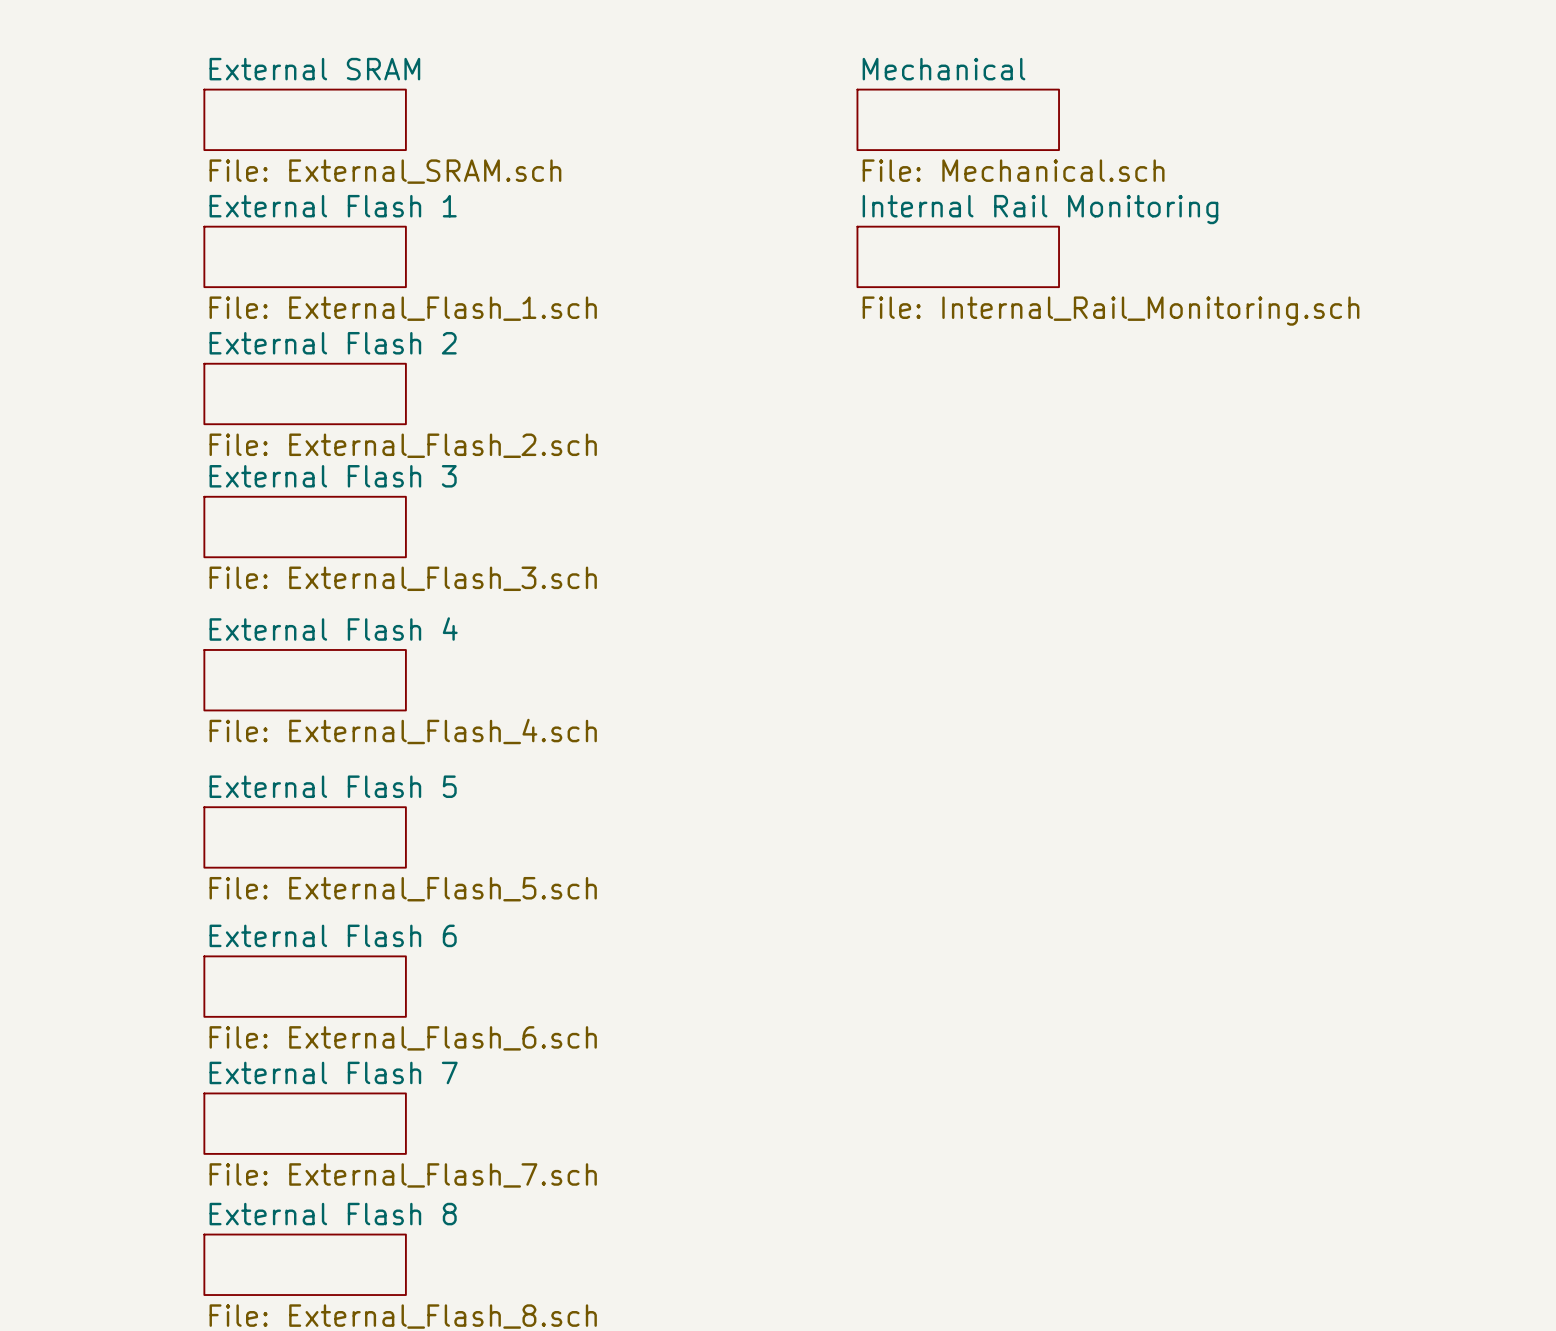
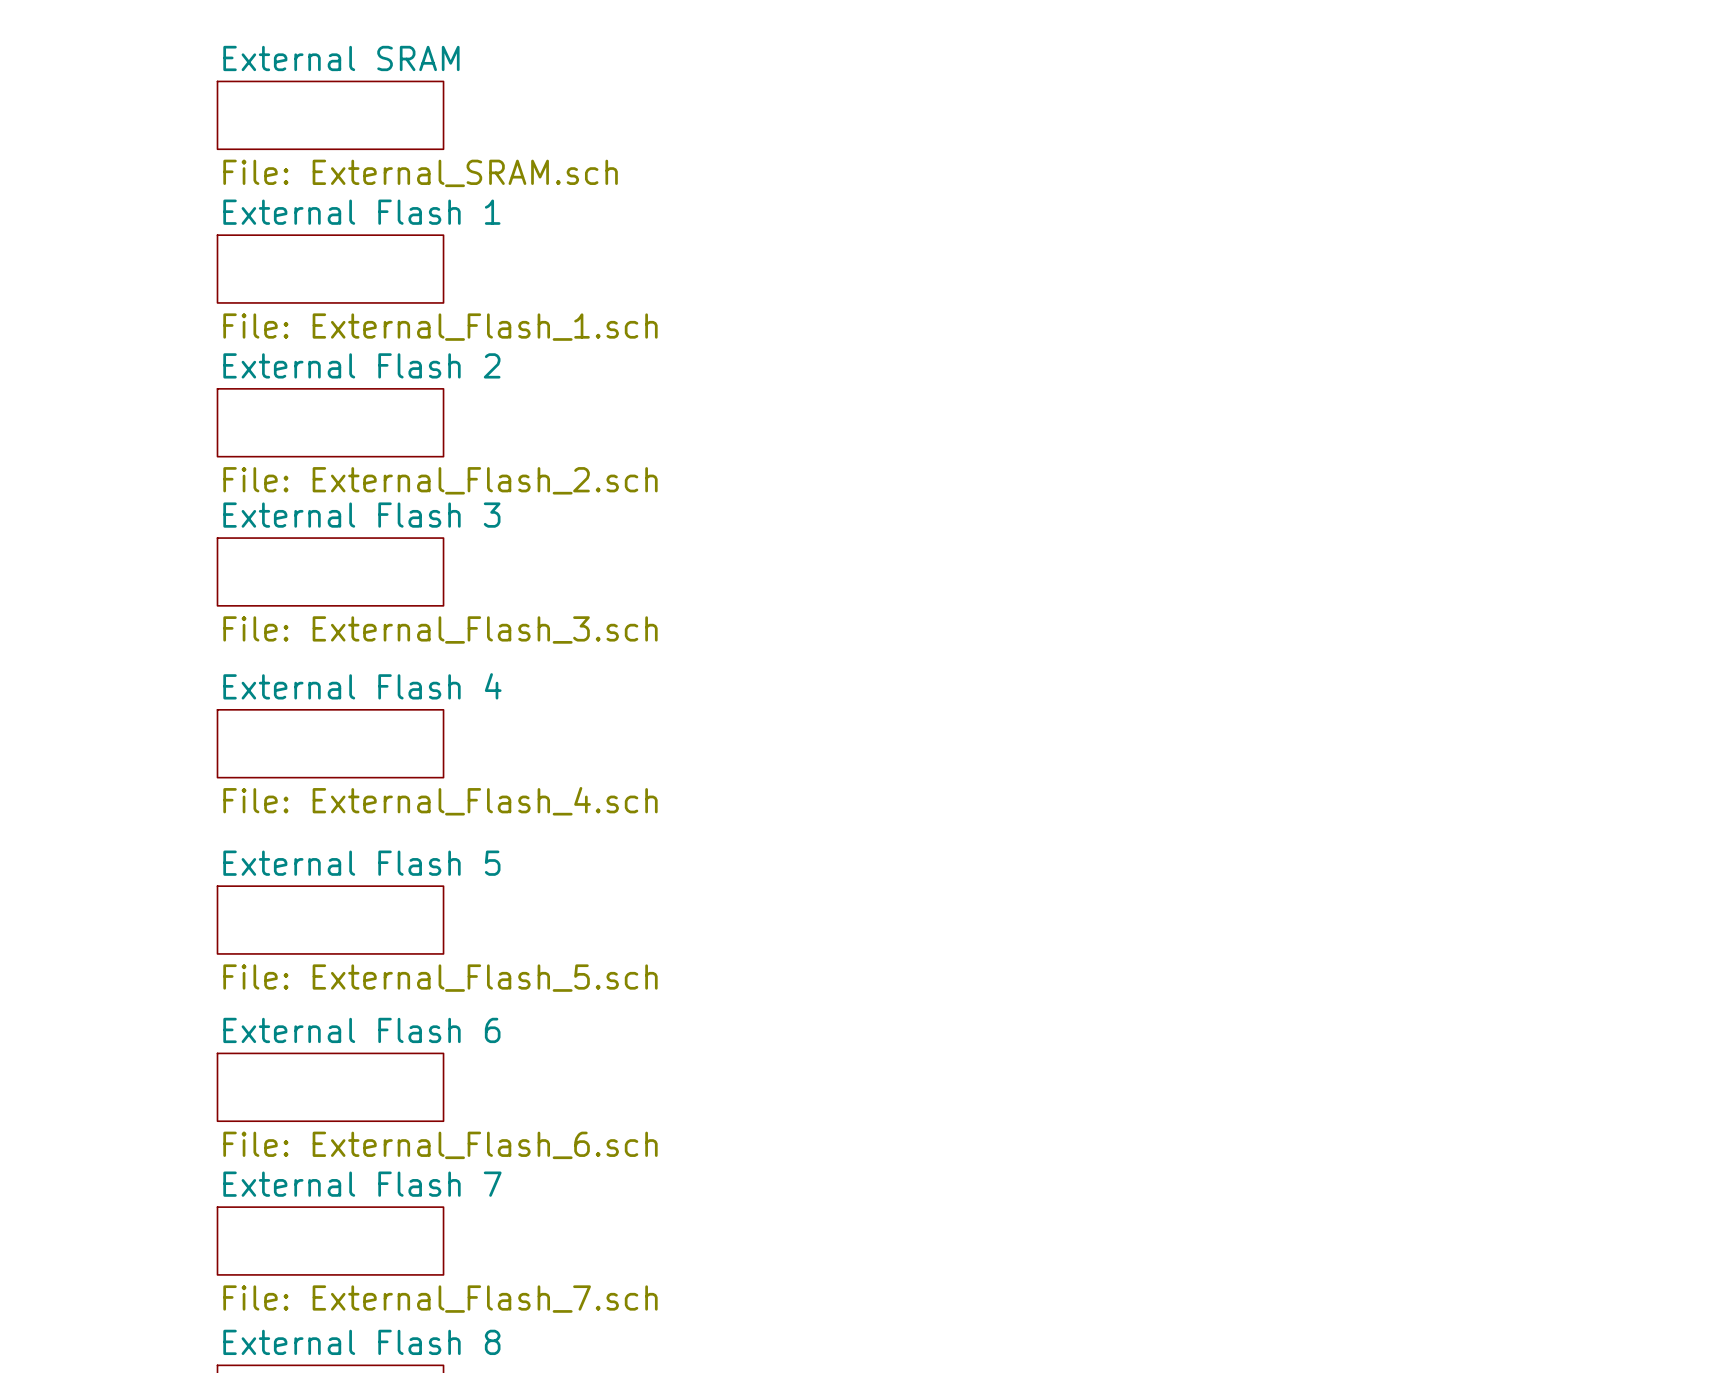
sheet Mechanical: File: Mechanical.sch (958, 119) -> none
sheet Internal Rail Monitoring: File: Internal_Rail_Monitoring.sch (958, 256) -> none

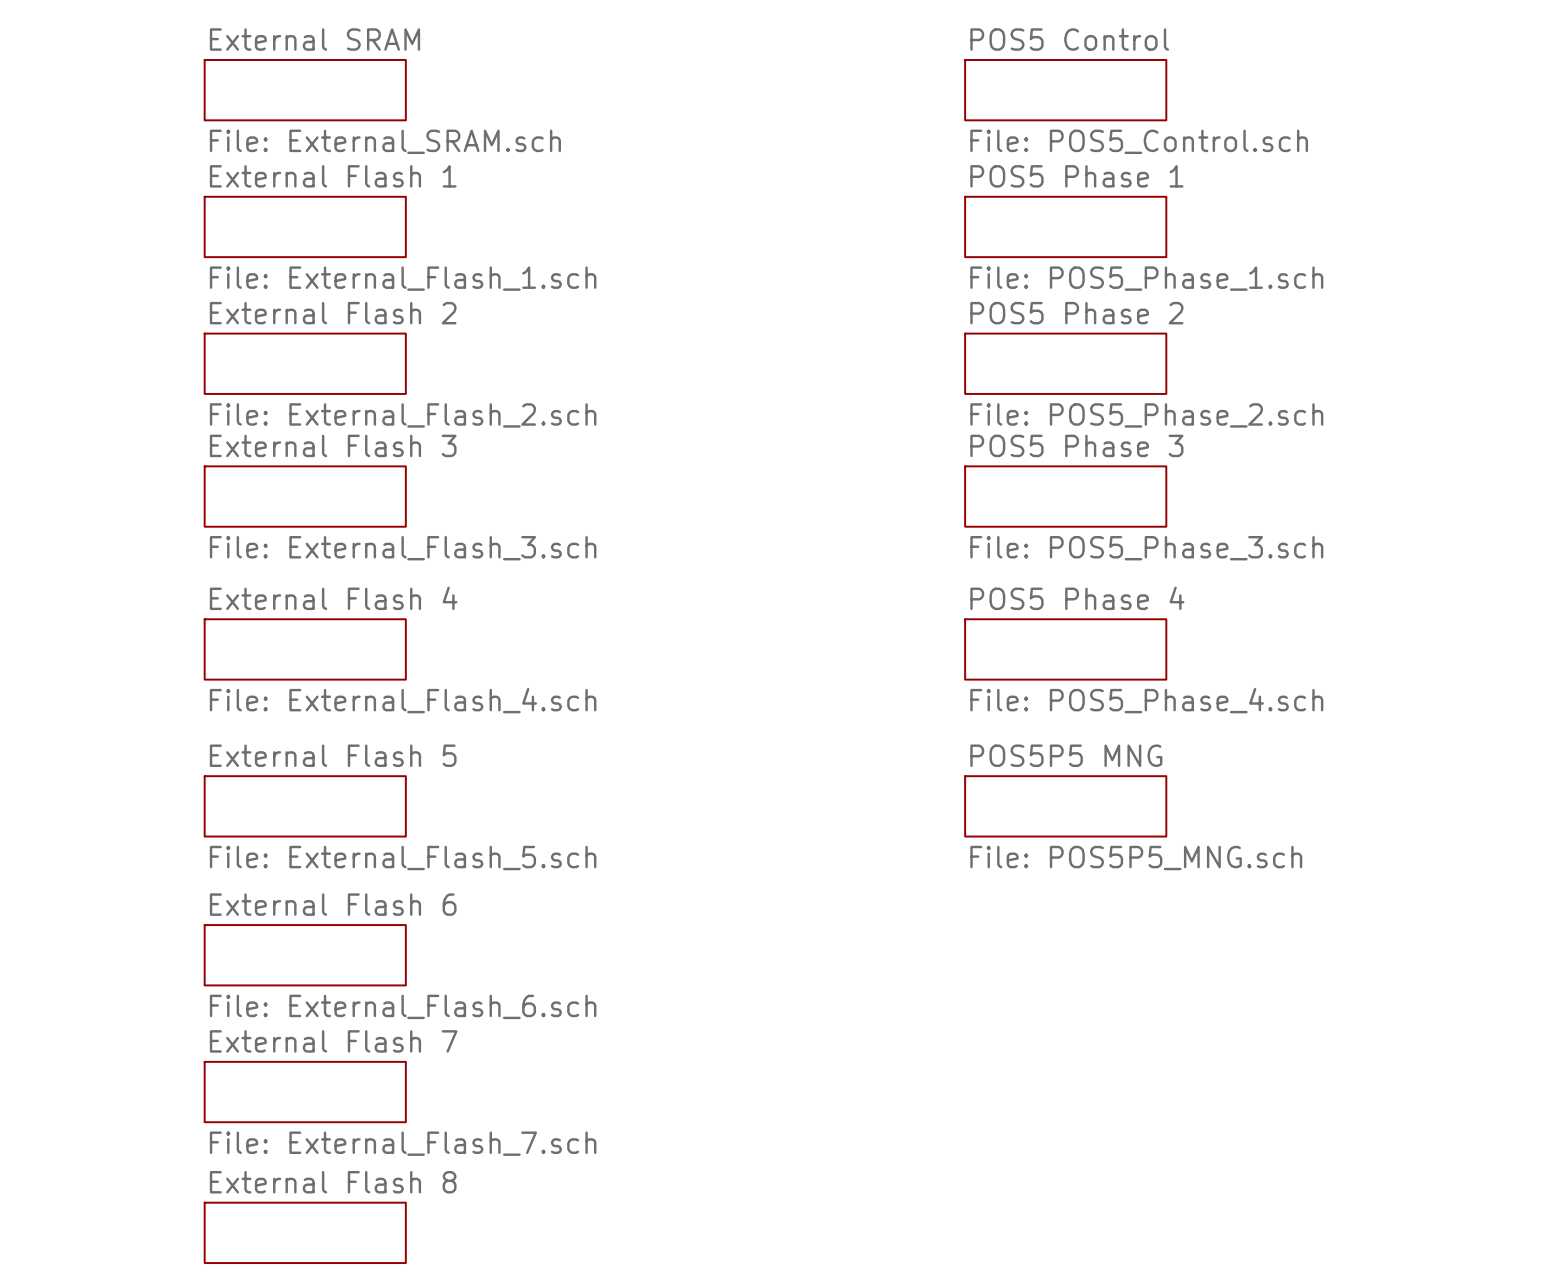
sheet POS5 Control: none -> File: POS5_Control.sch (1065, 90)
sheet POS5 Phase 1: none -> File: POS5_Phase_1.sch (1065, 226)
sheet POS5 Phase 2: none -> File: POS5_Phase_2.sch (1065, 363)
sheet POS5 Phase 3: none -> File: POS5_Phase_3.sch (1065, 496)
sheet POS5 Phase 4: none -> File: POS5_Phase_4.sch (1065, 649)
sheet POS5P5 MNG: none -> File: POS5P5_MNG.sch (1065, 806)

